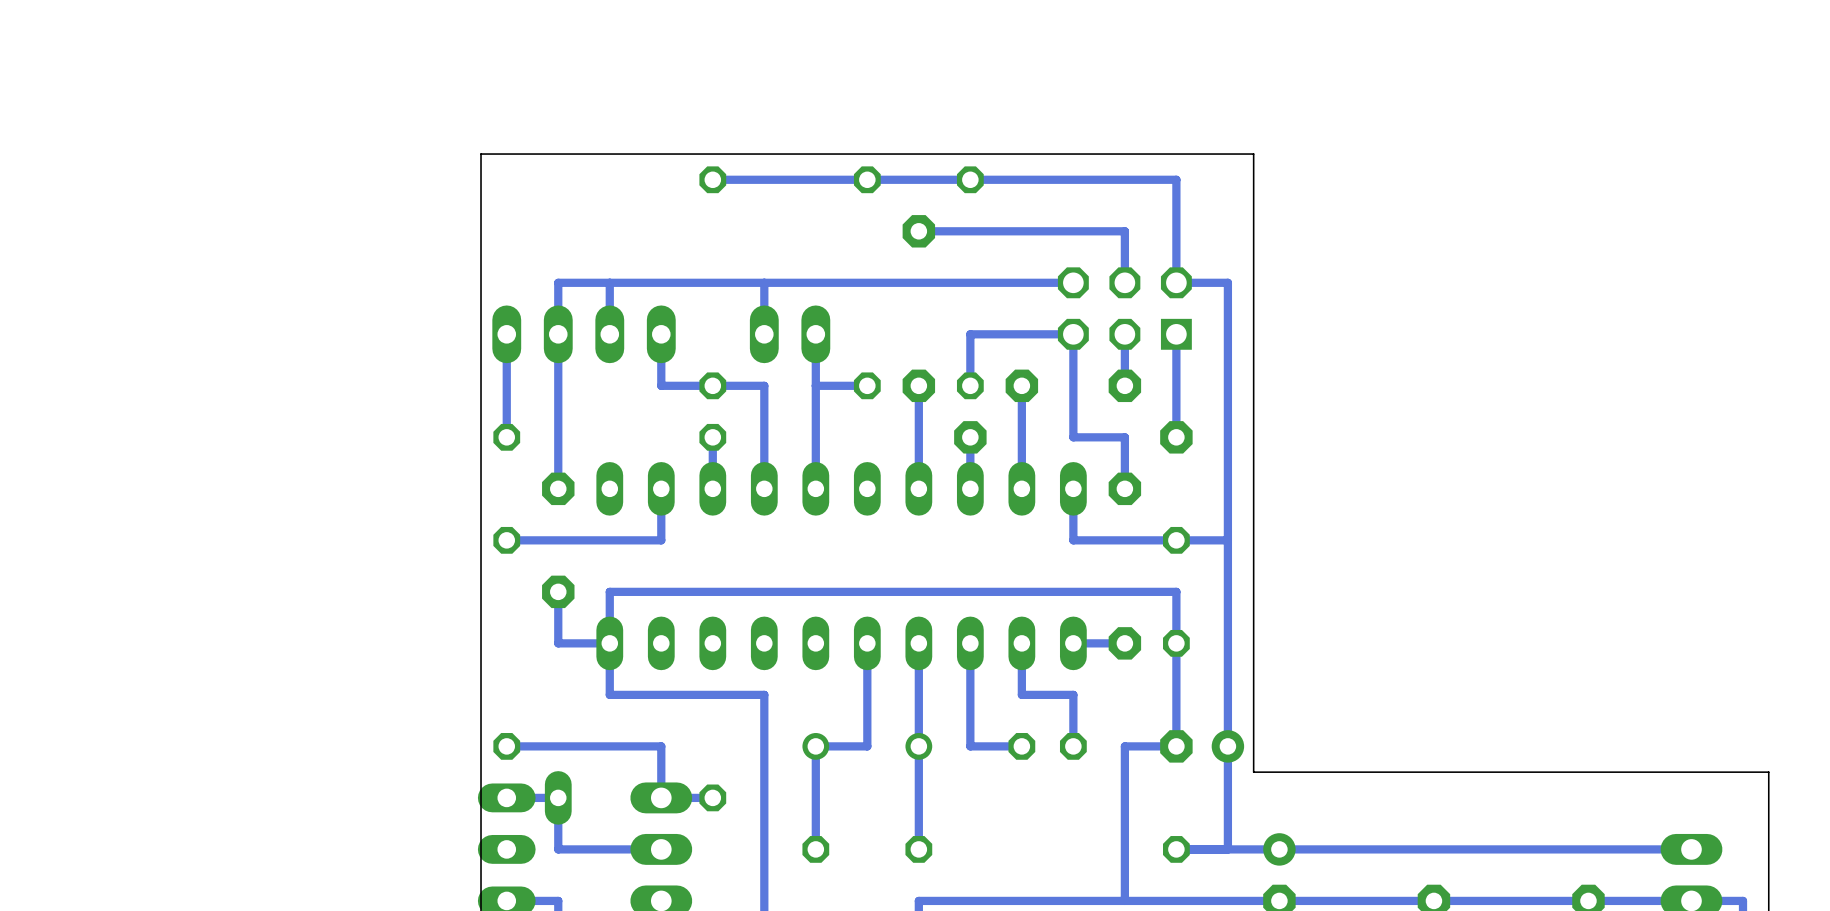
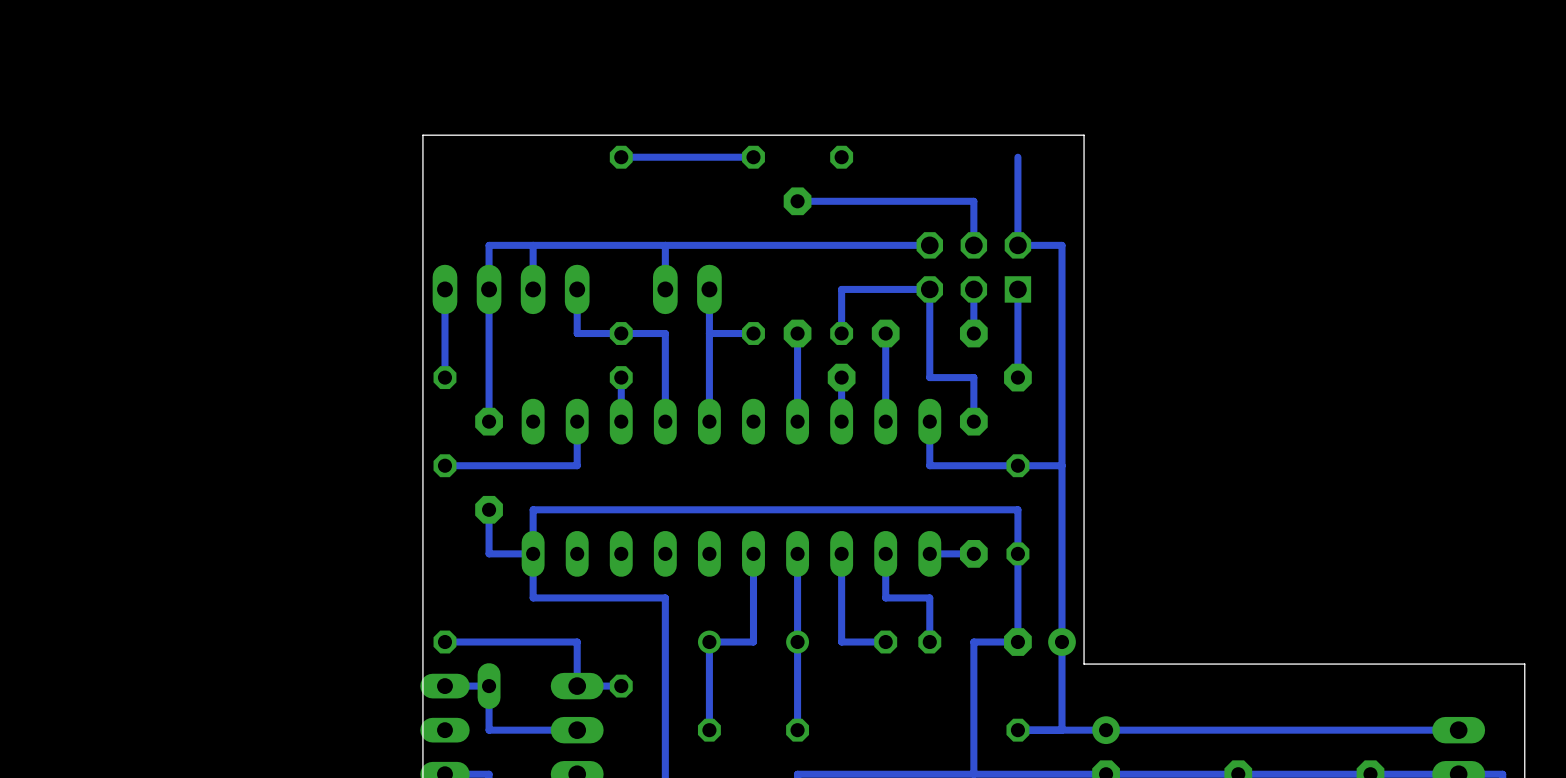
bottom track: (1176, 179) (867, 179) -> none

